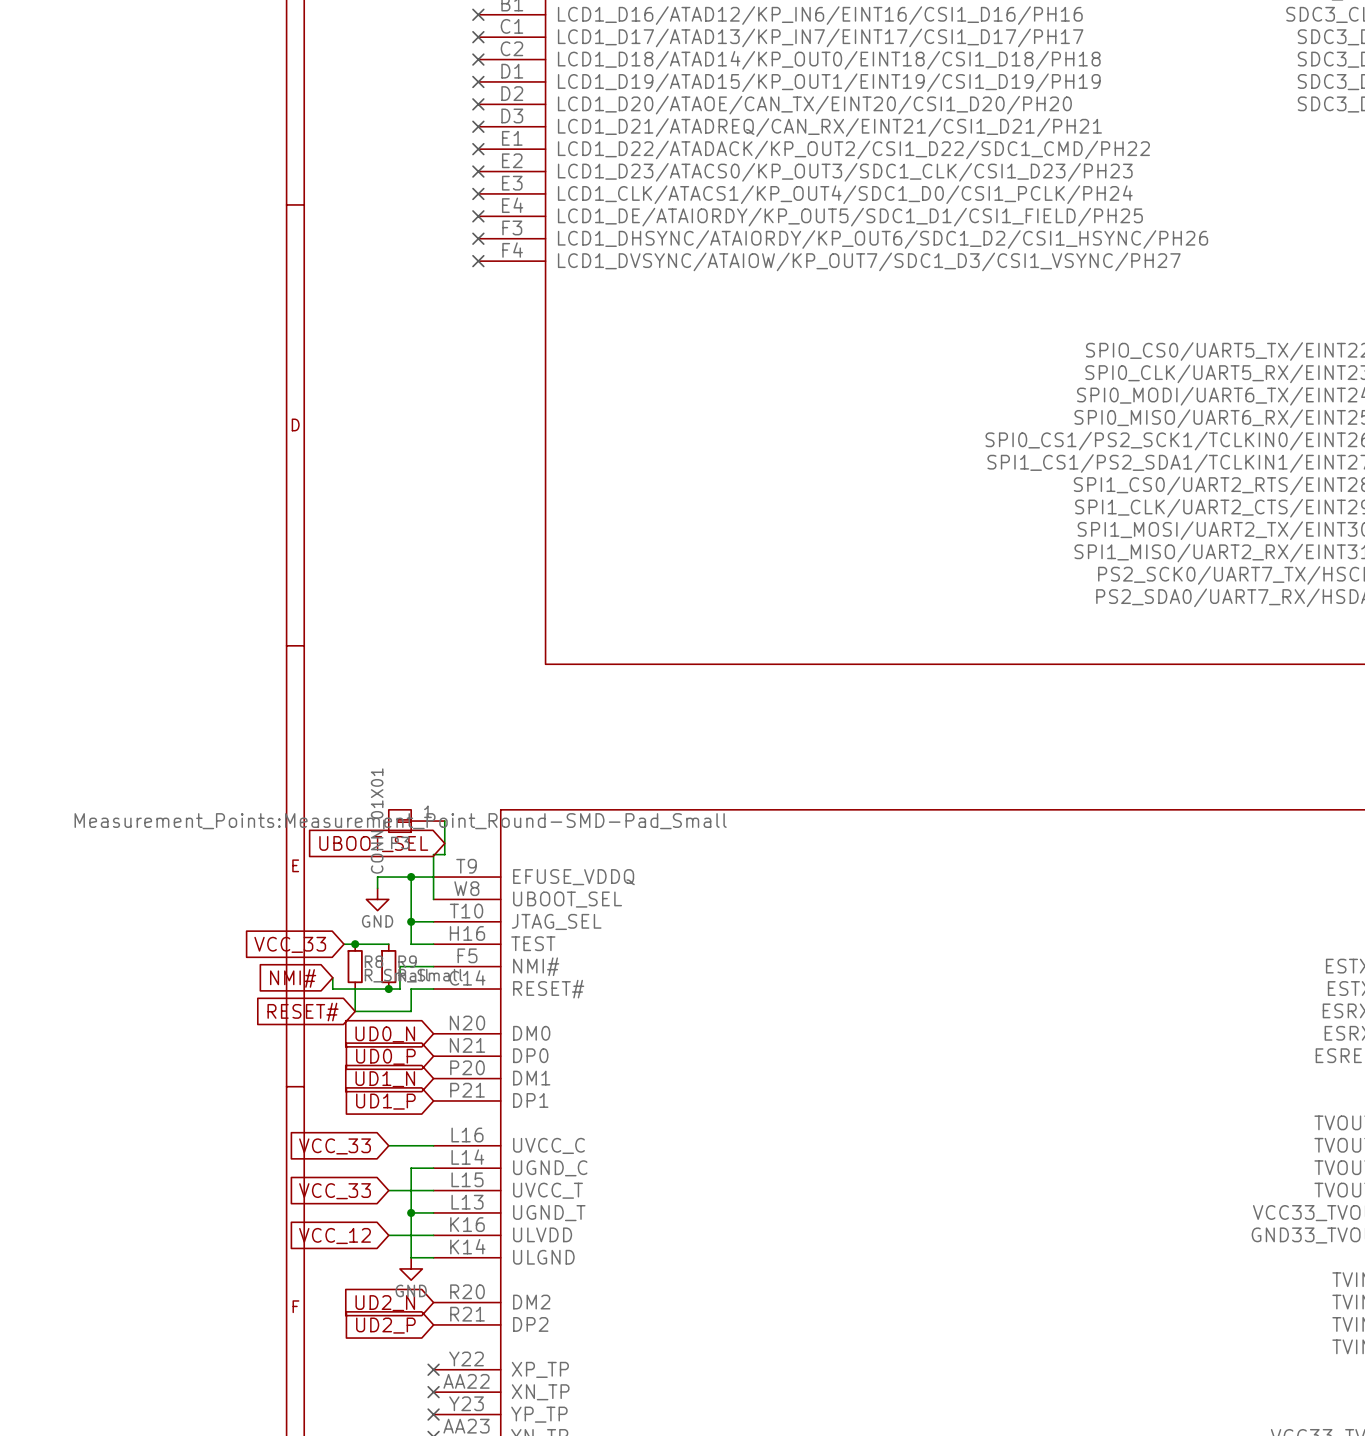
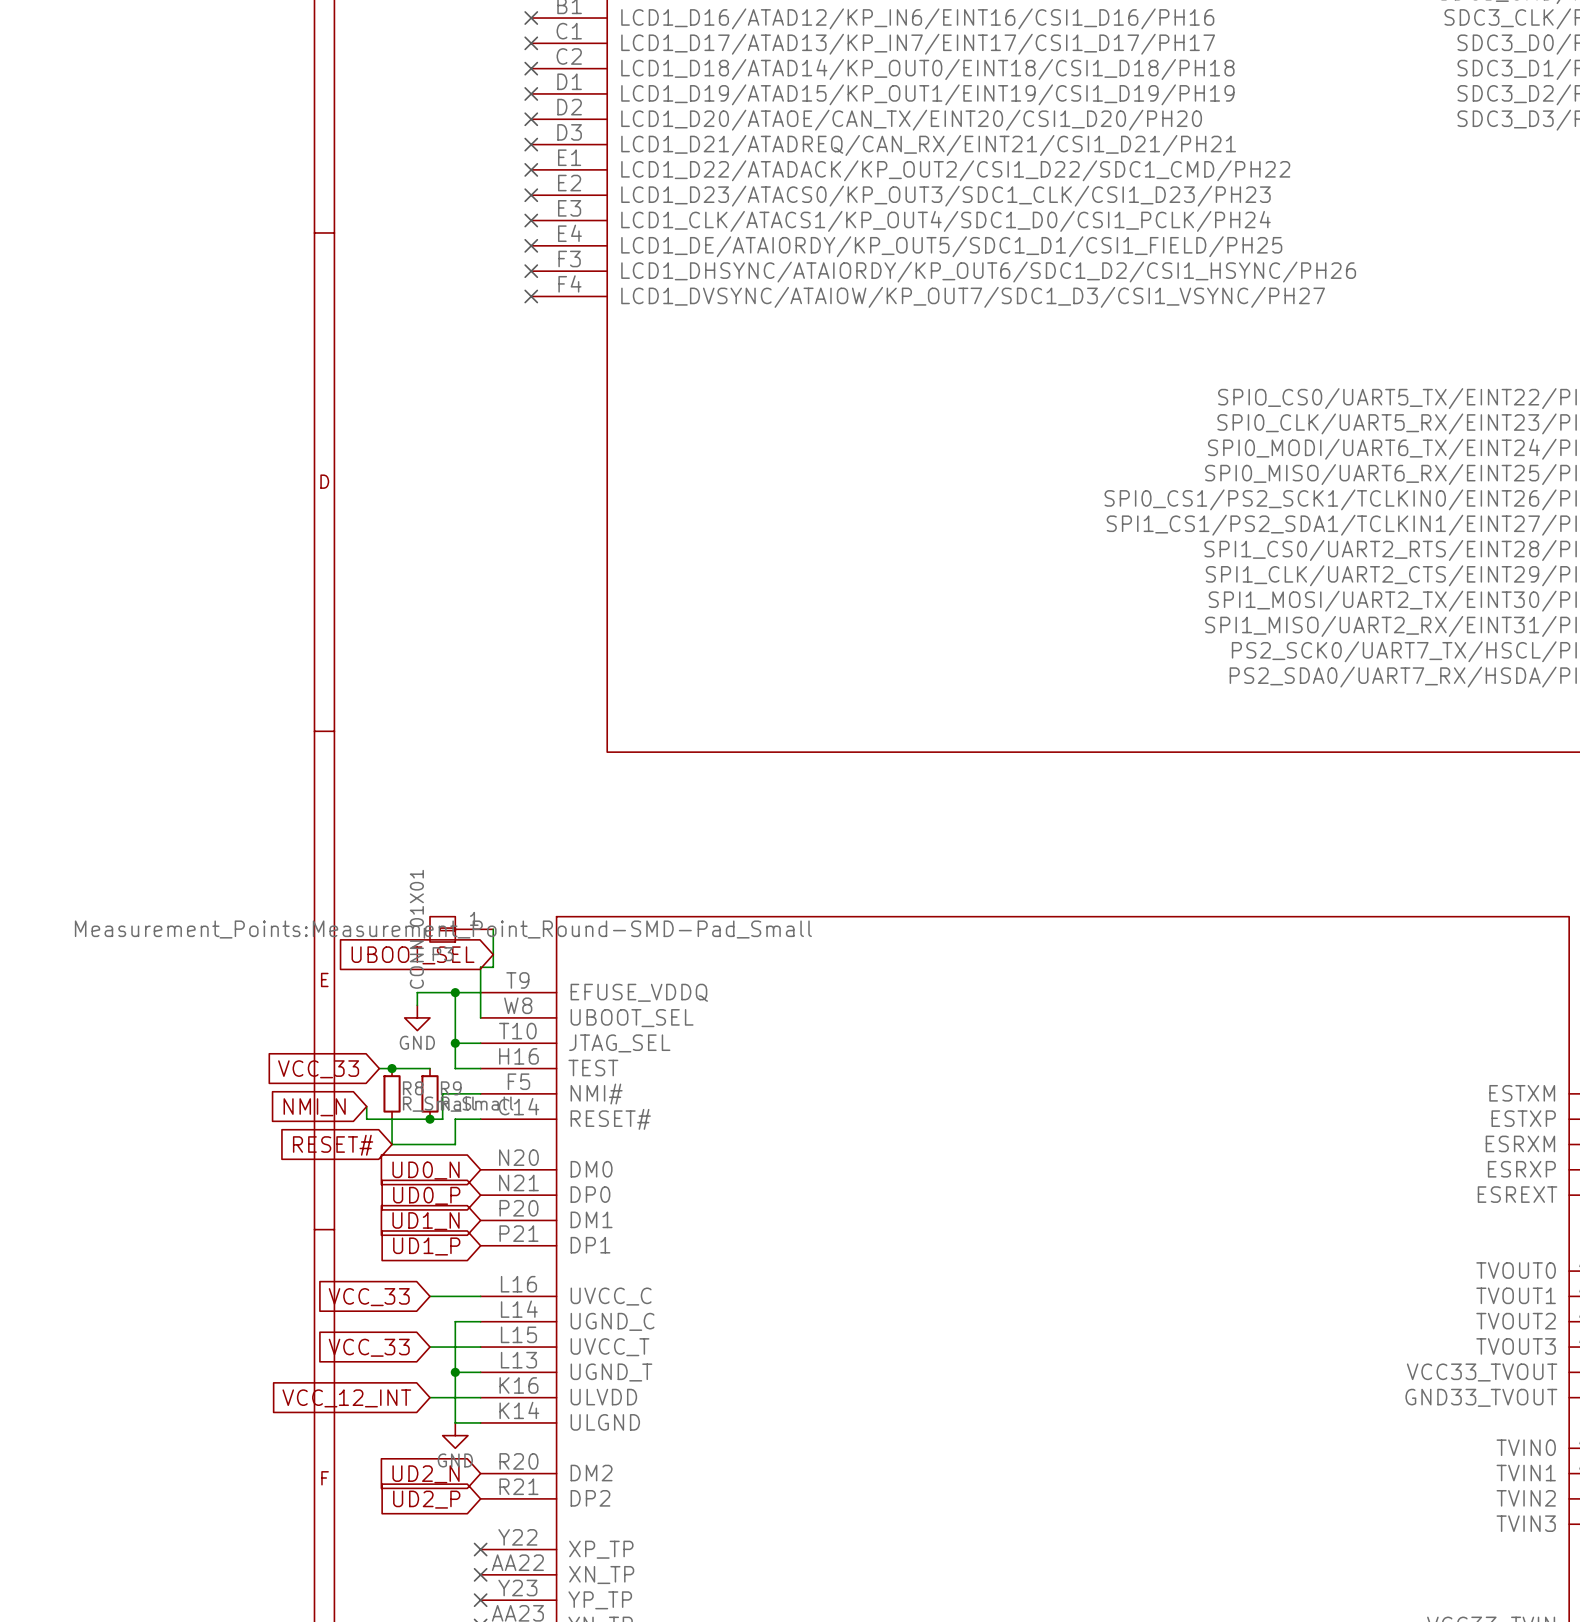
global label: NMI# (293, 978) -> NMI_N (314, 1107)
global label: VCC_12 (335, 1236) -> VCC_12_INT (346, 1398)

